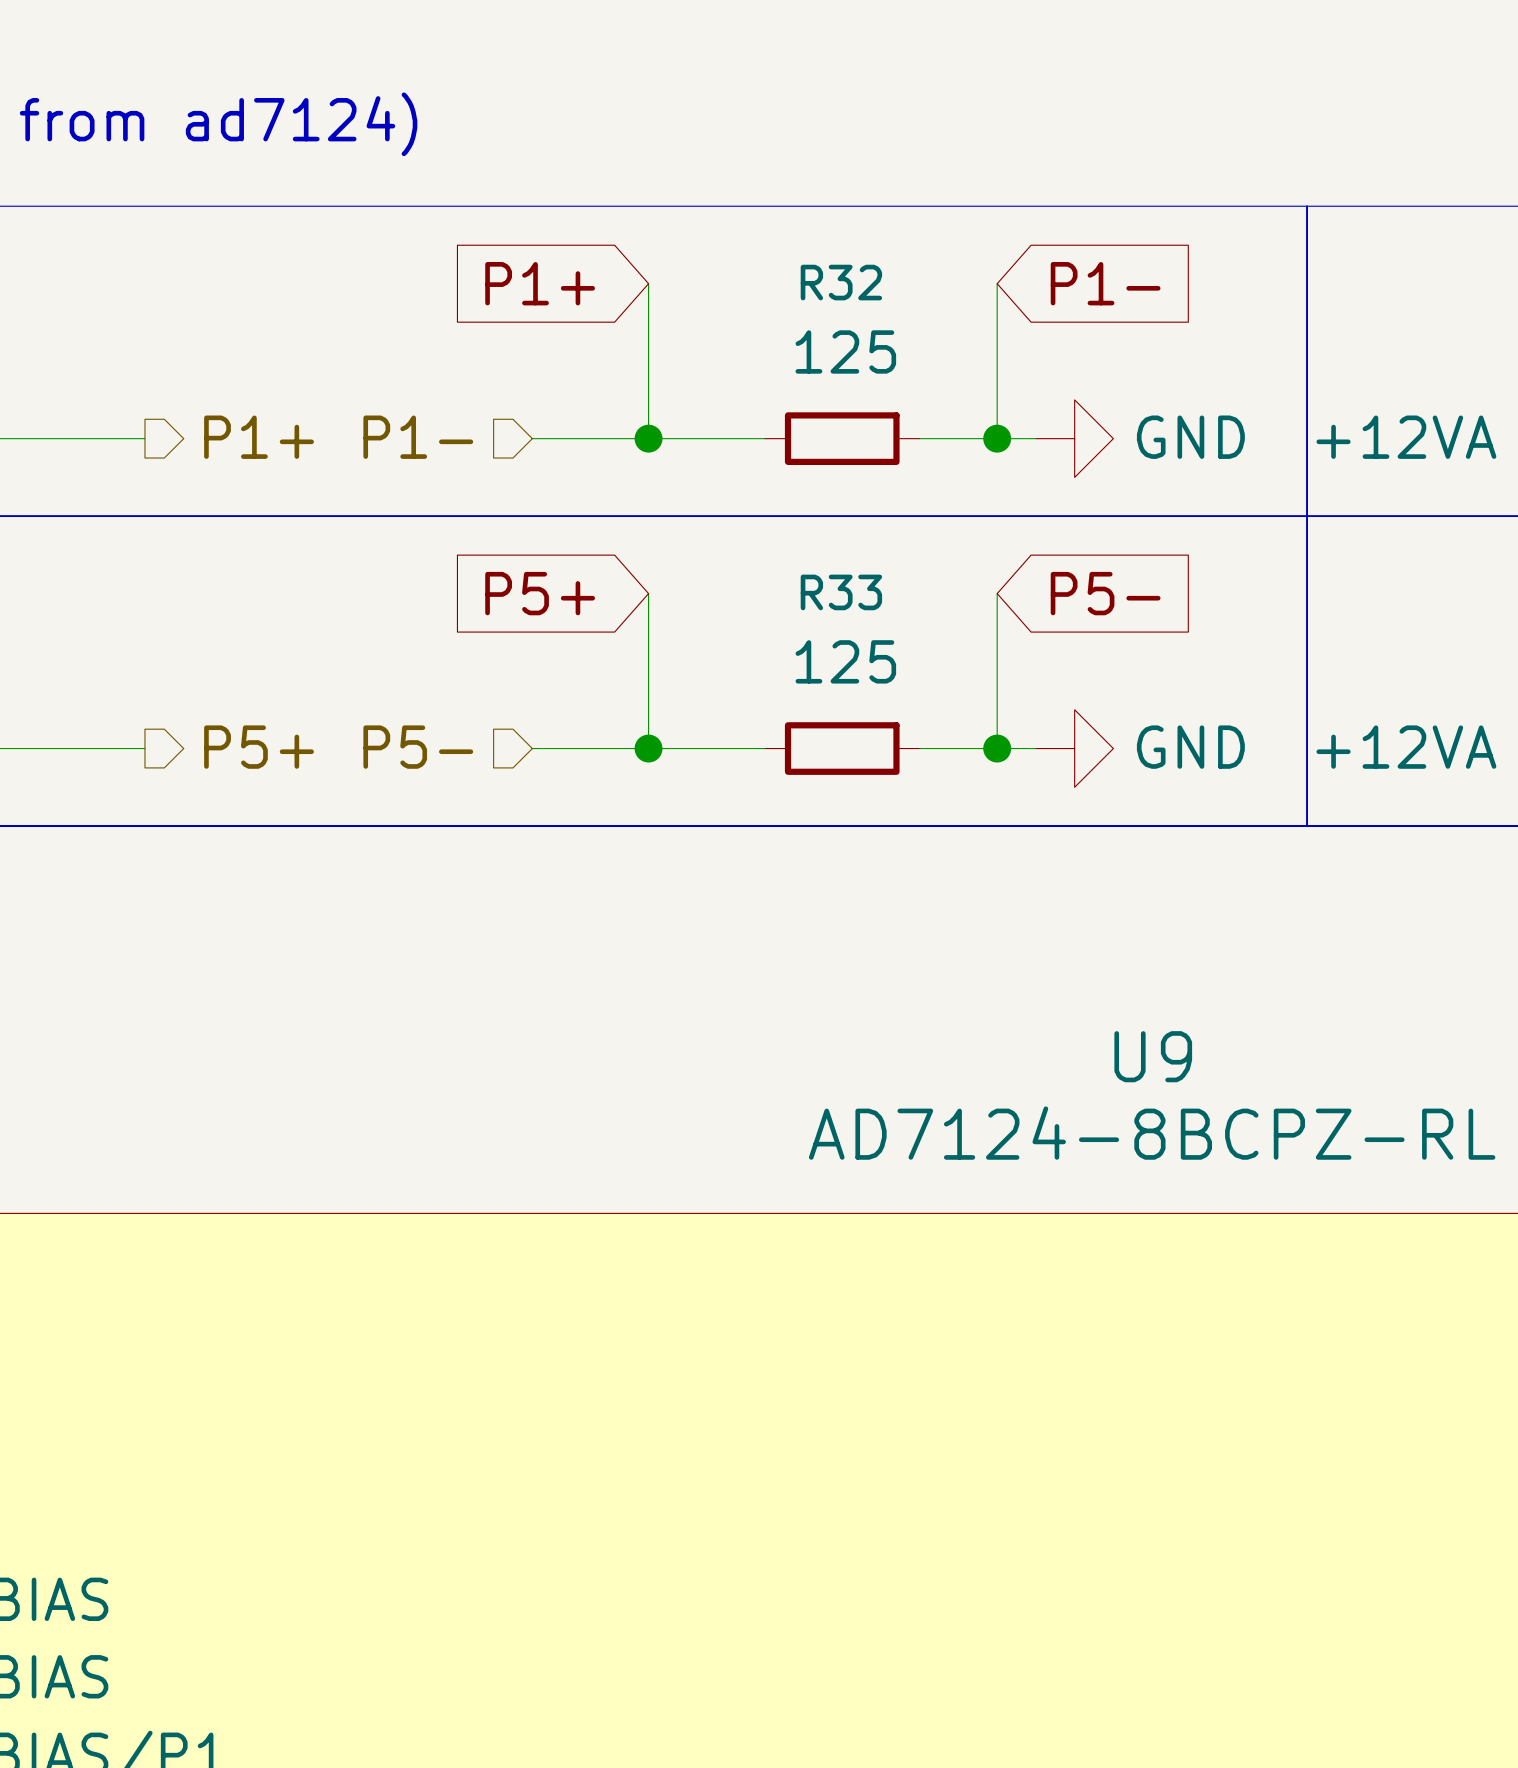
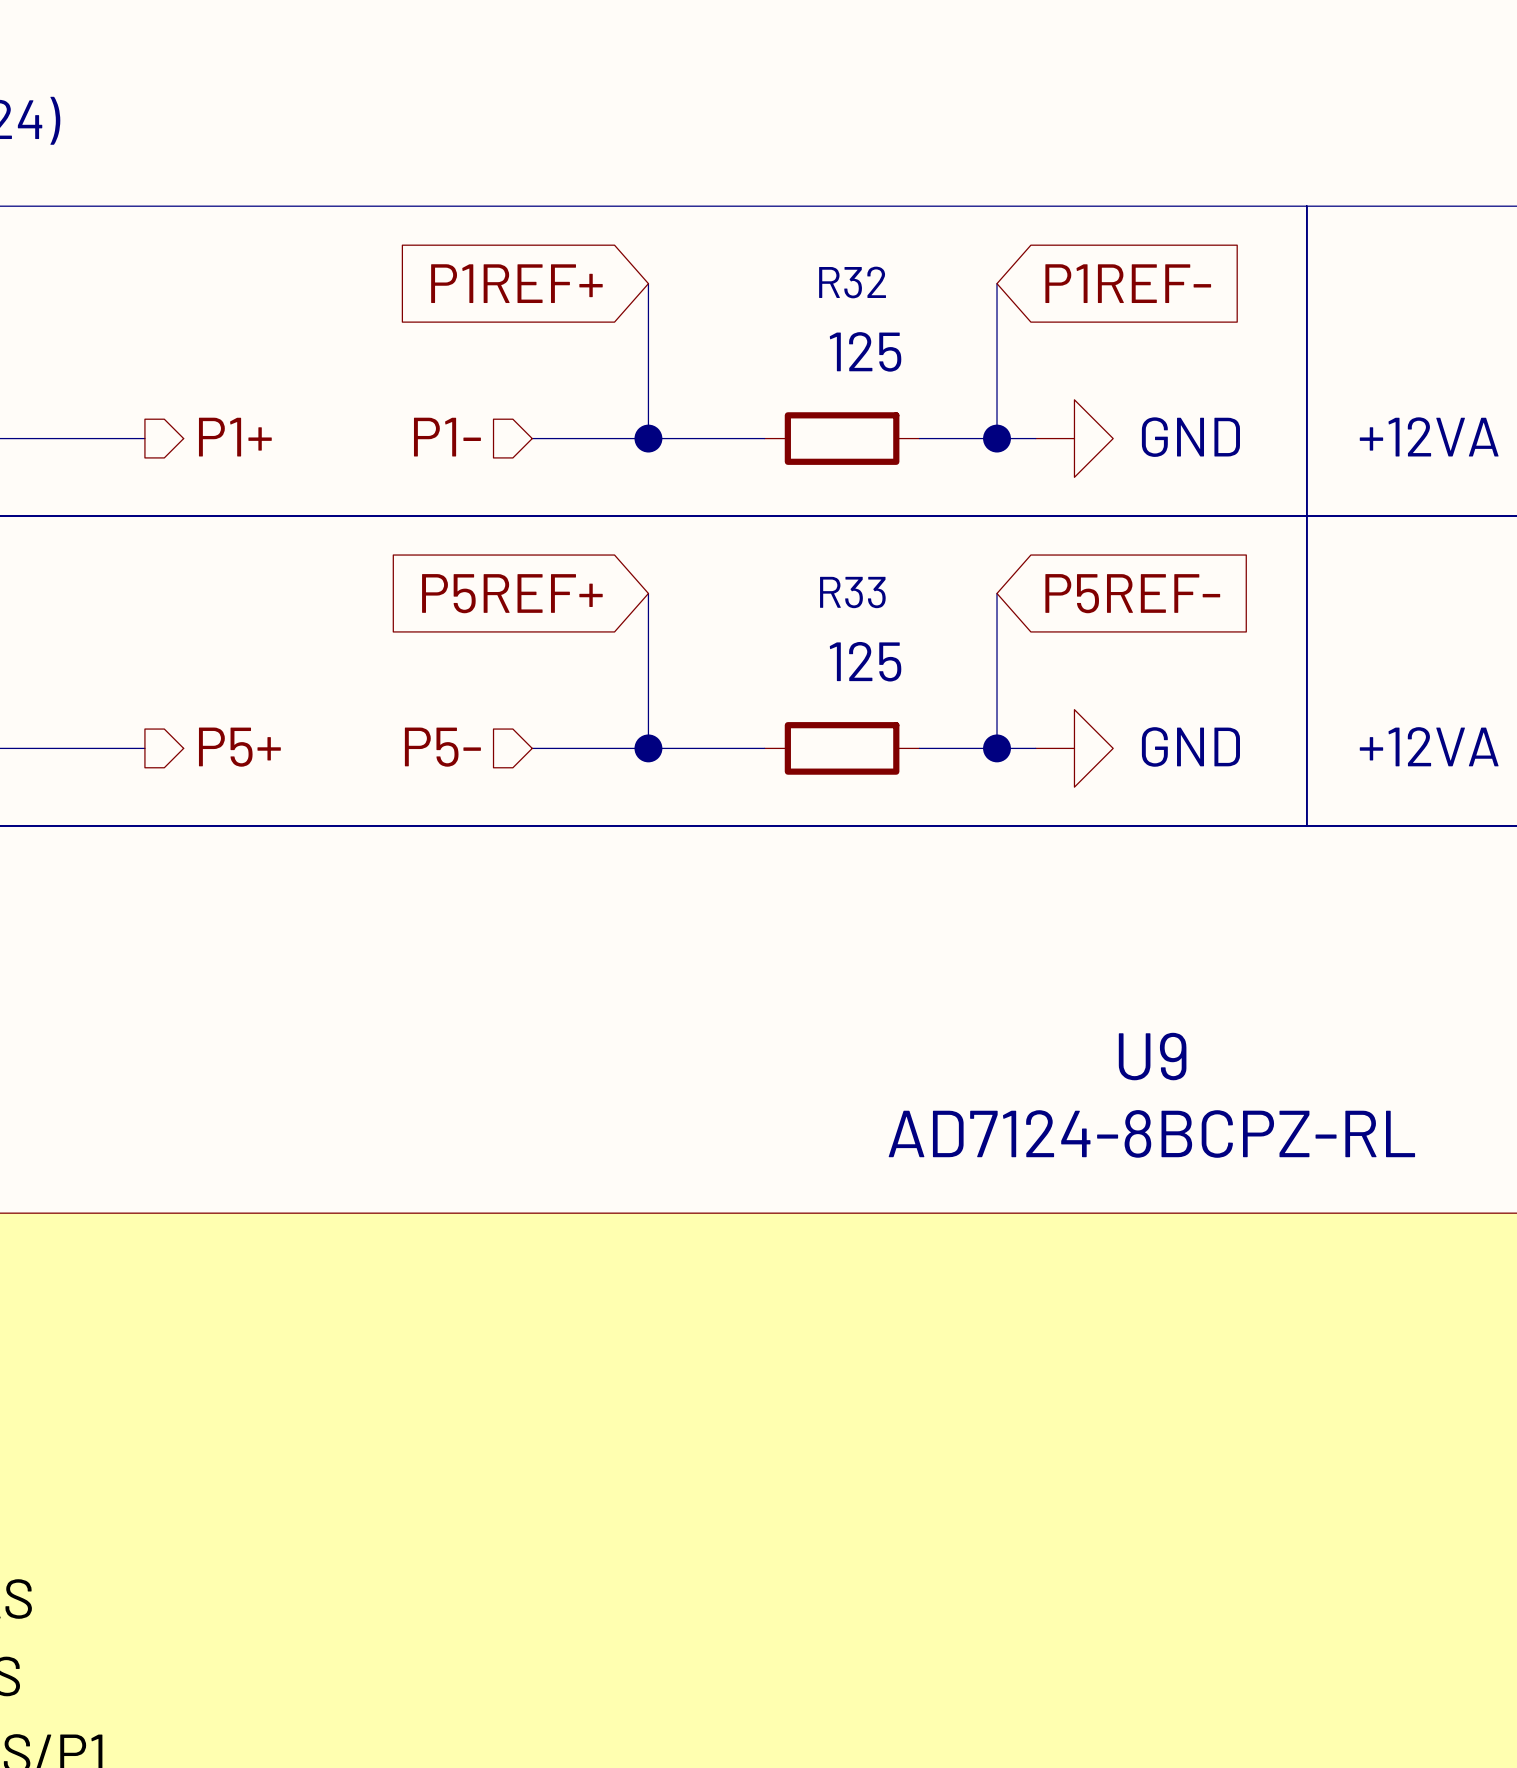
global label: P1+ (540, 283) -> P1REF+ (516, 283)
global label: P1- (1105, 283) -> P1REF- (1128, 283)
global label: P5+ (540, 593) -> P5REF+ (512, 593)
global label: P5- (1105, 593) -> P5REF- (1132, 593)

